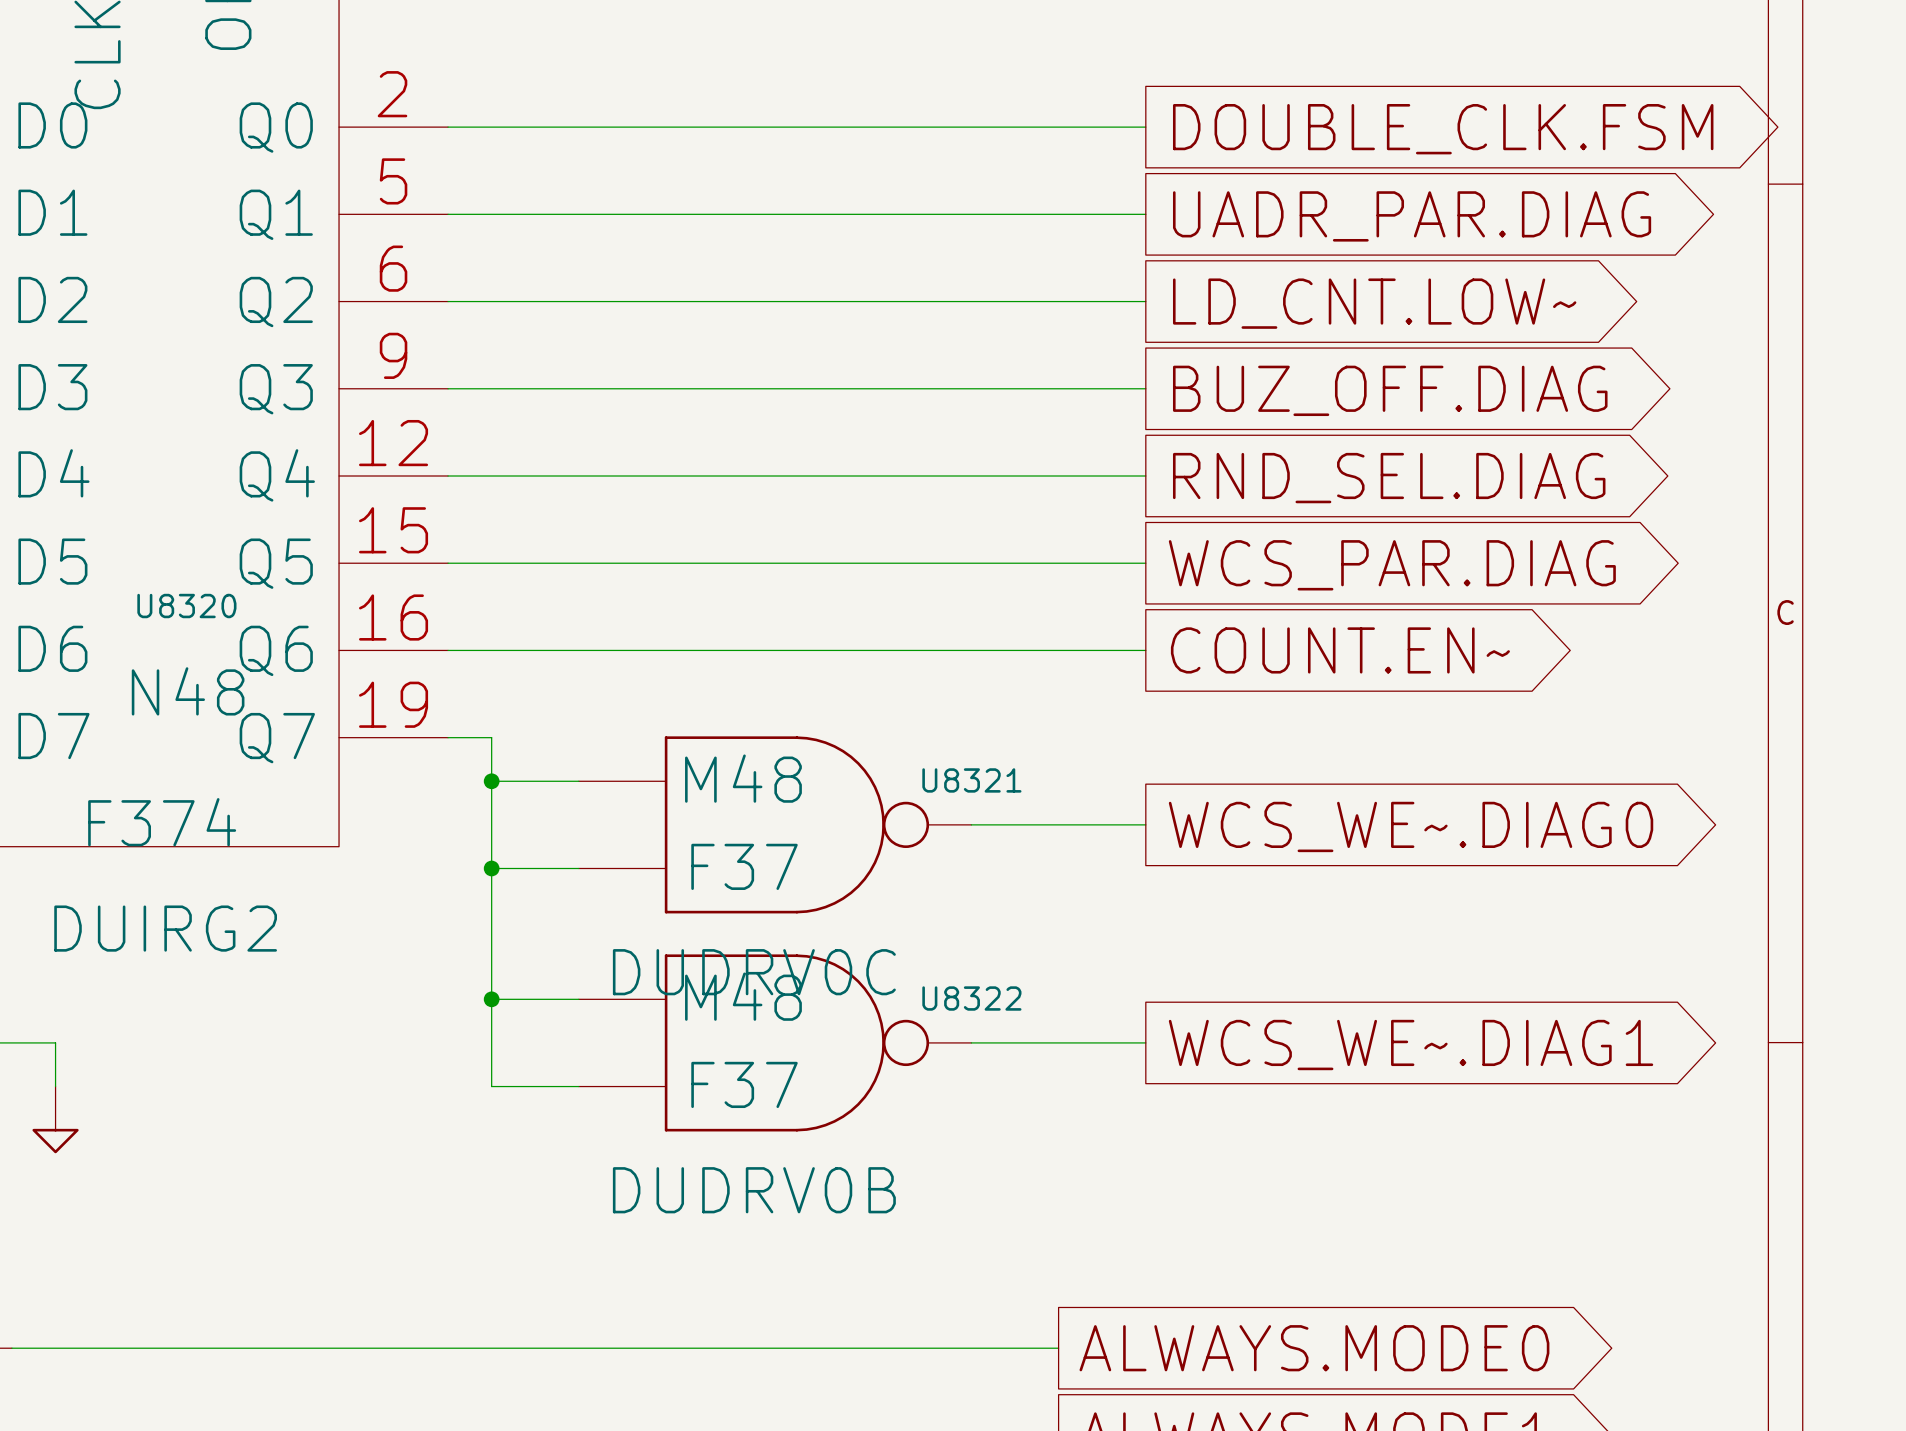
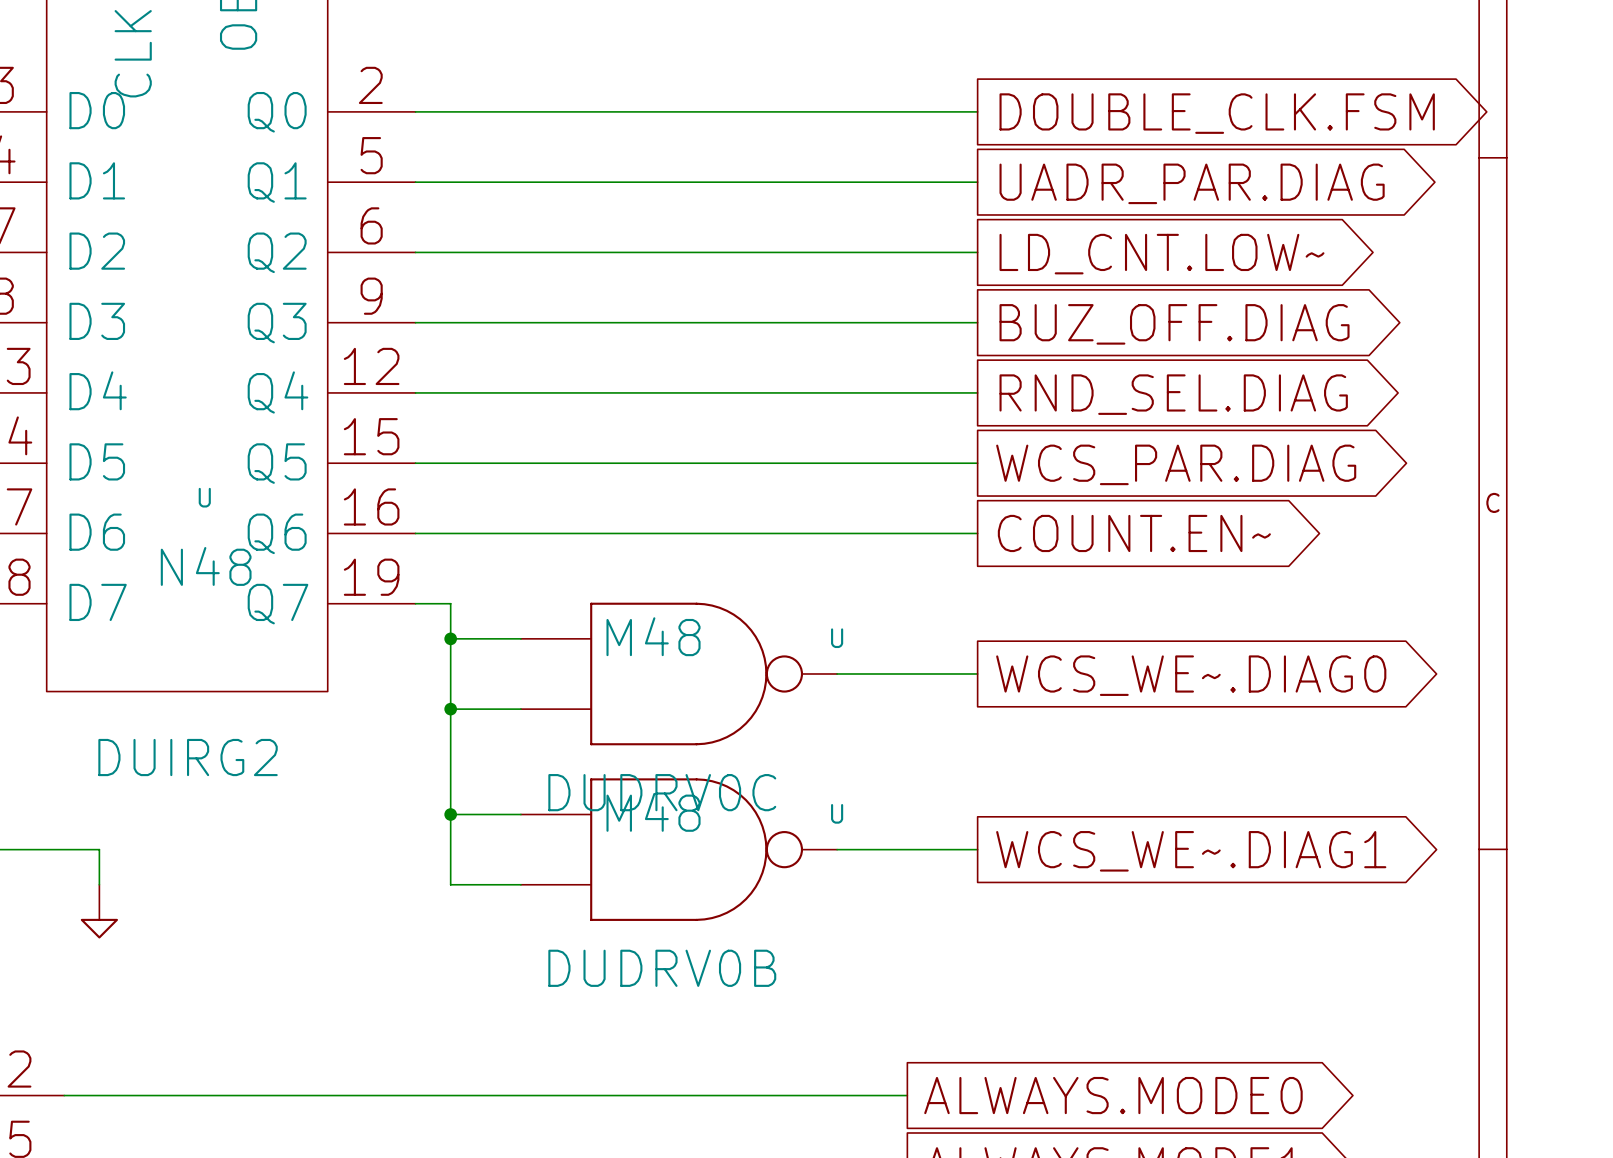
U8320 name: U8320 (186, 606) -> U (204, 497)
U8321 name: U8321 (971, 780) -> U (837, 638)
U8320 value: F374 (162, 822) -> none
U8321 value: F37 (744, 866) -> none
U8322 name: U8322 (971, 998) -> U (837, 813)
U8322 value: F37 (744, 1084) -> none

